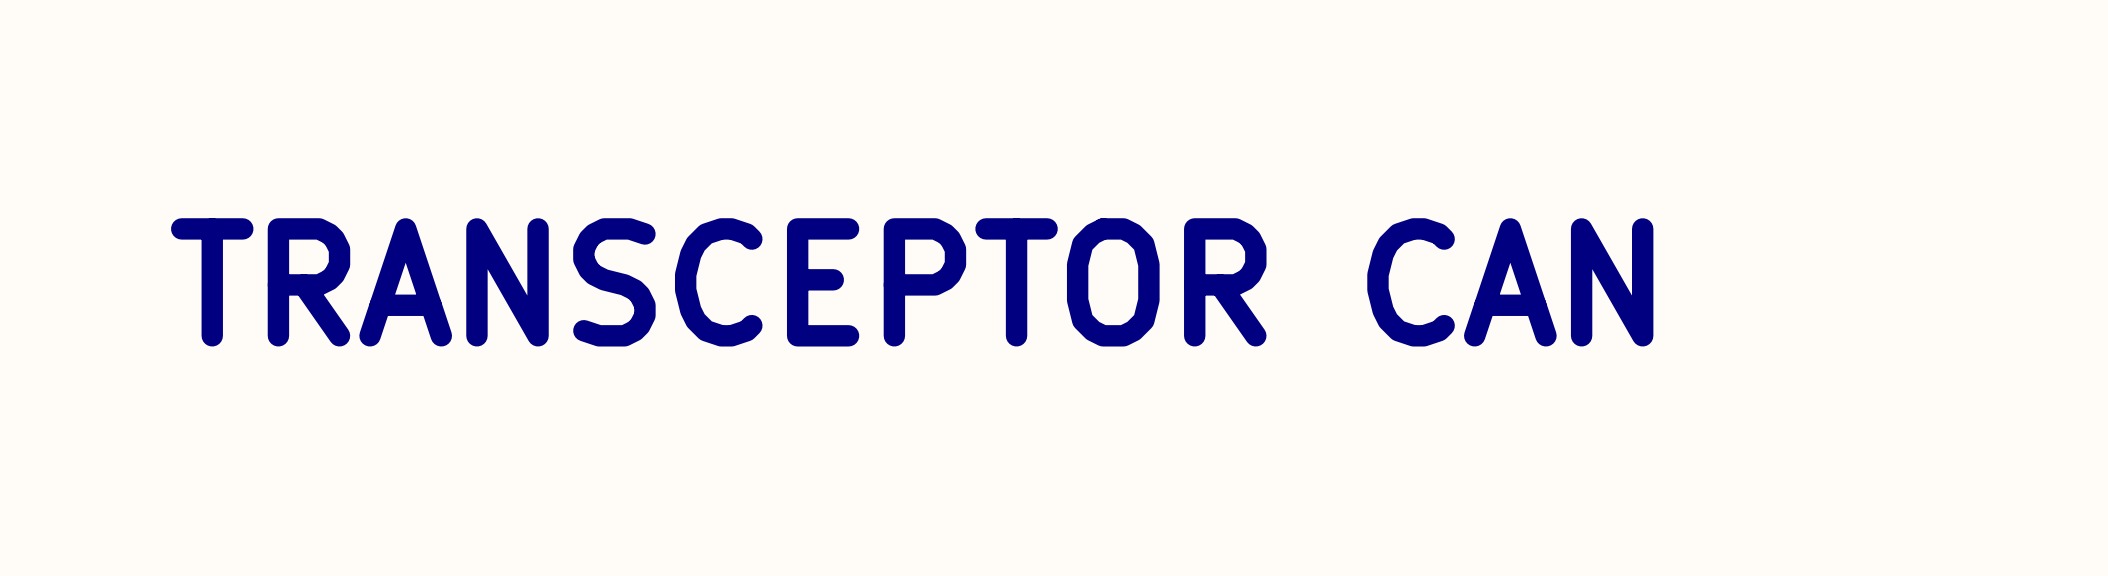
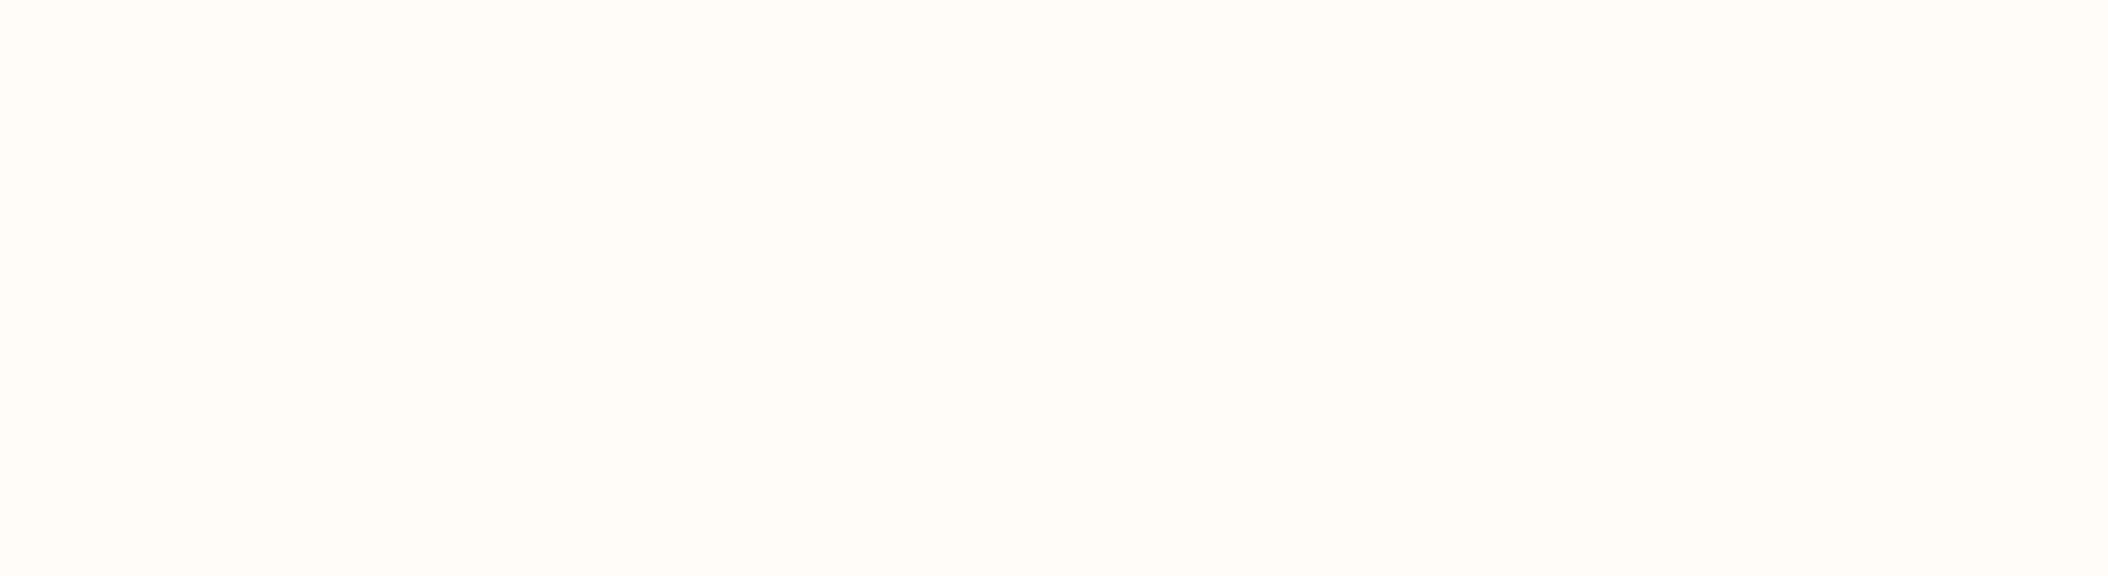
text: TRANSCEPTOR CAN (912, 282) -> none

